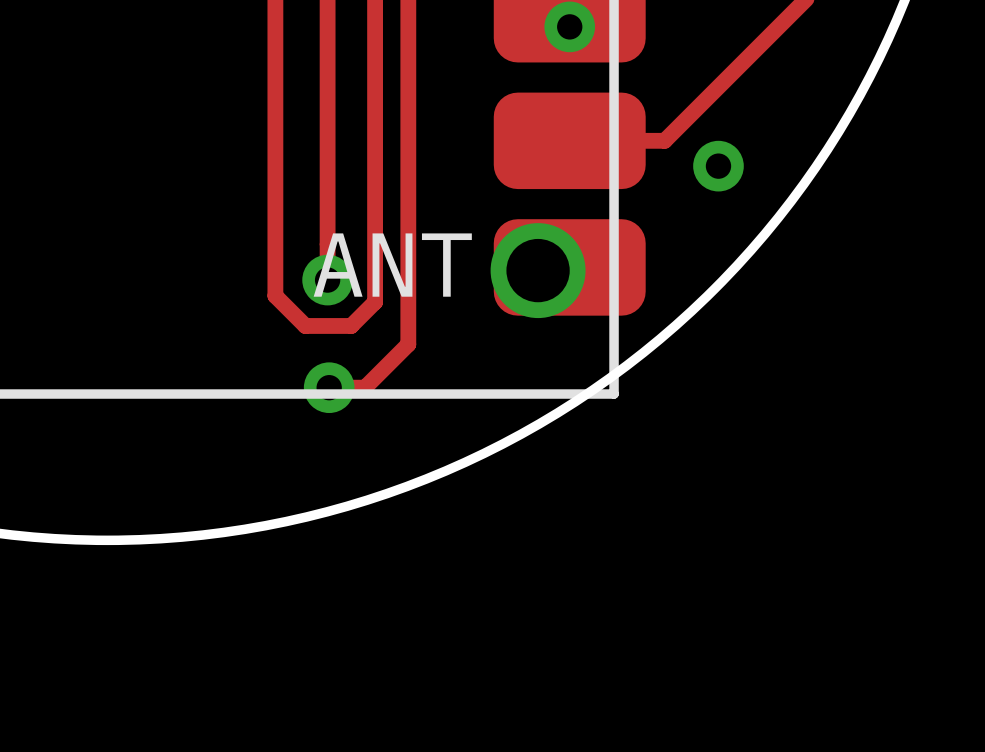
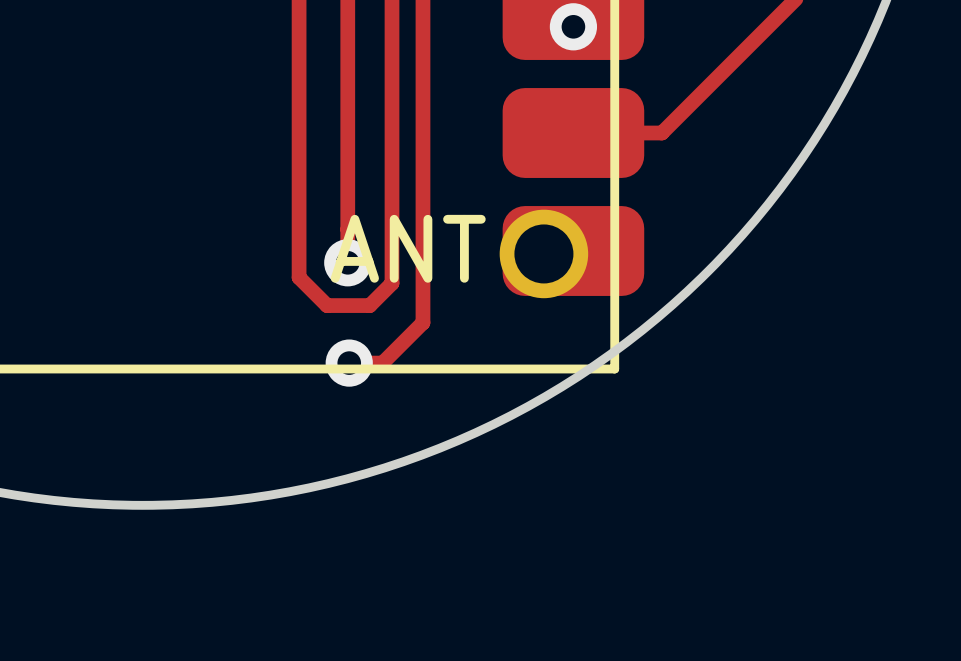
via: (718, 166) -> none

